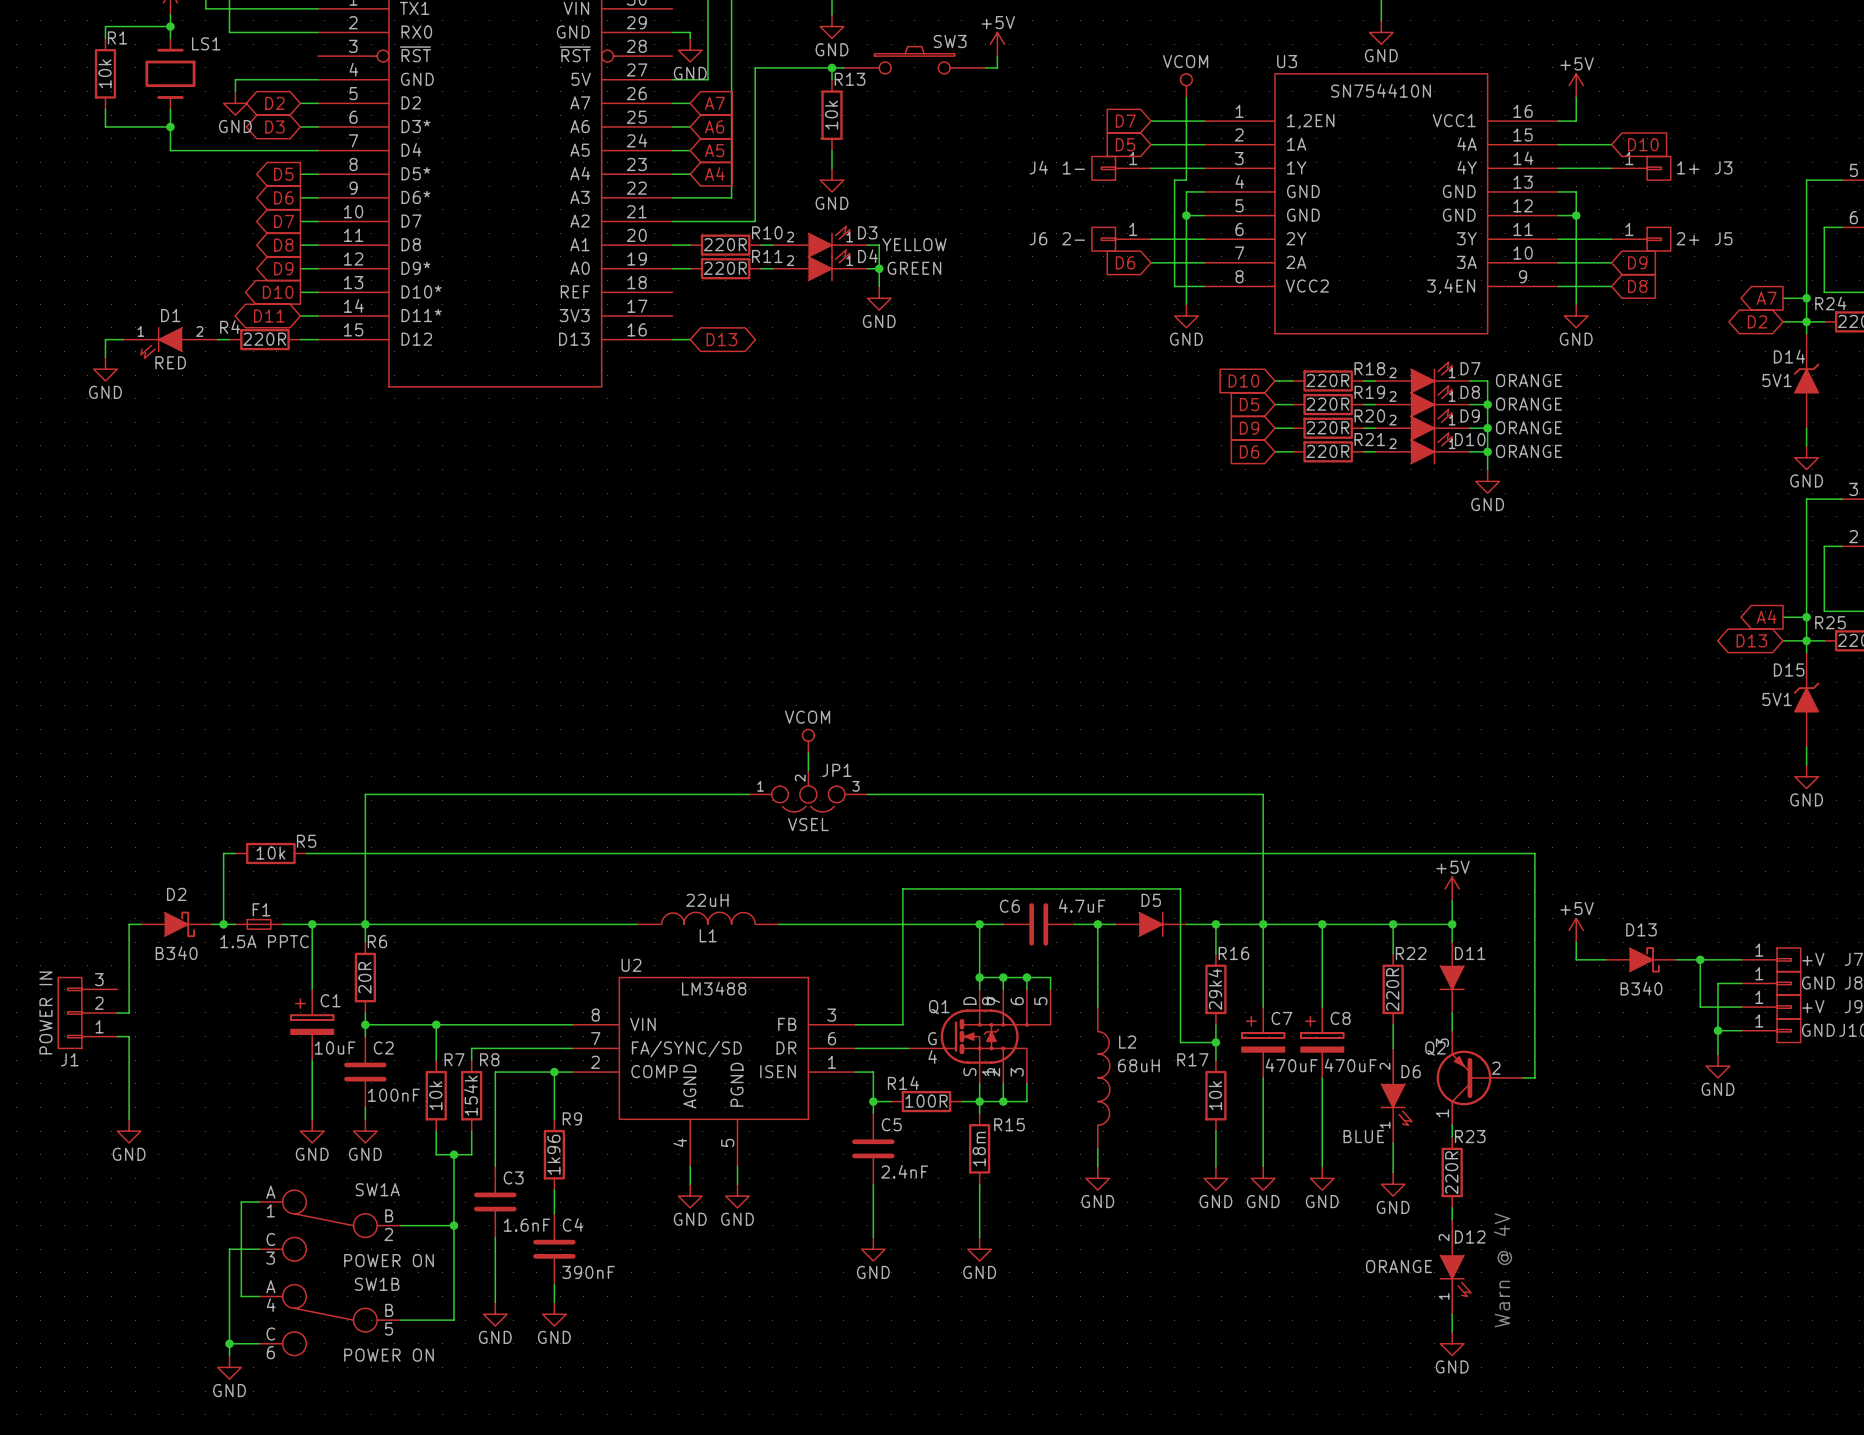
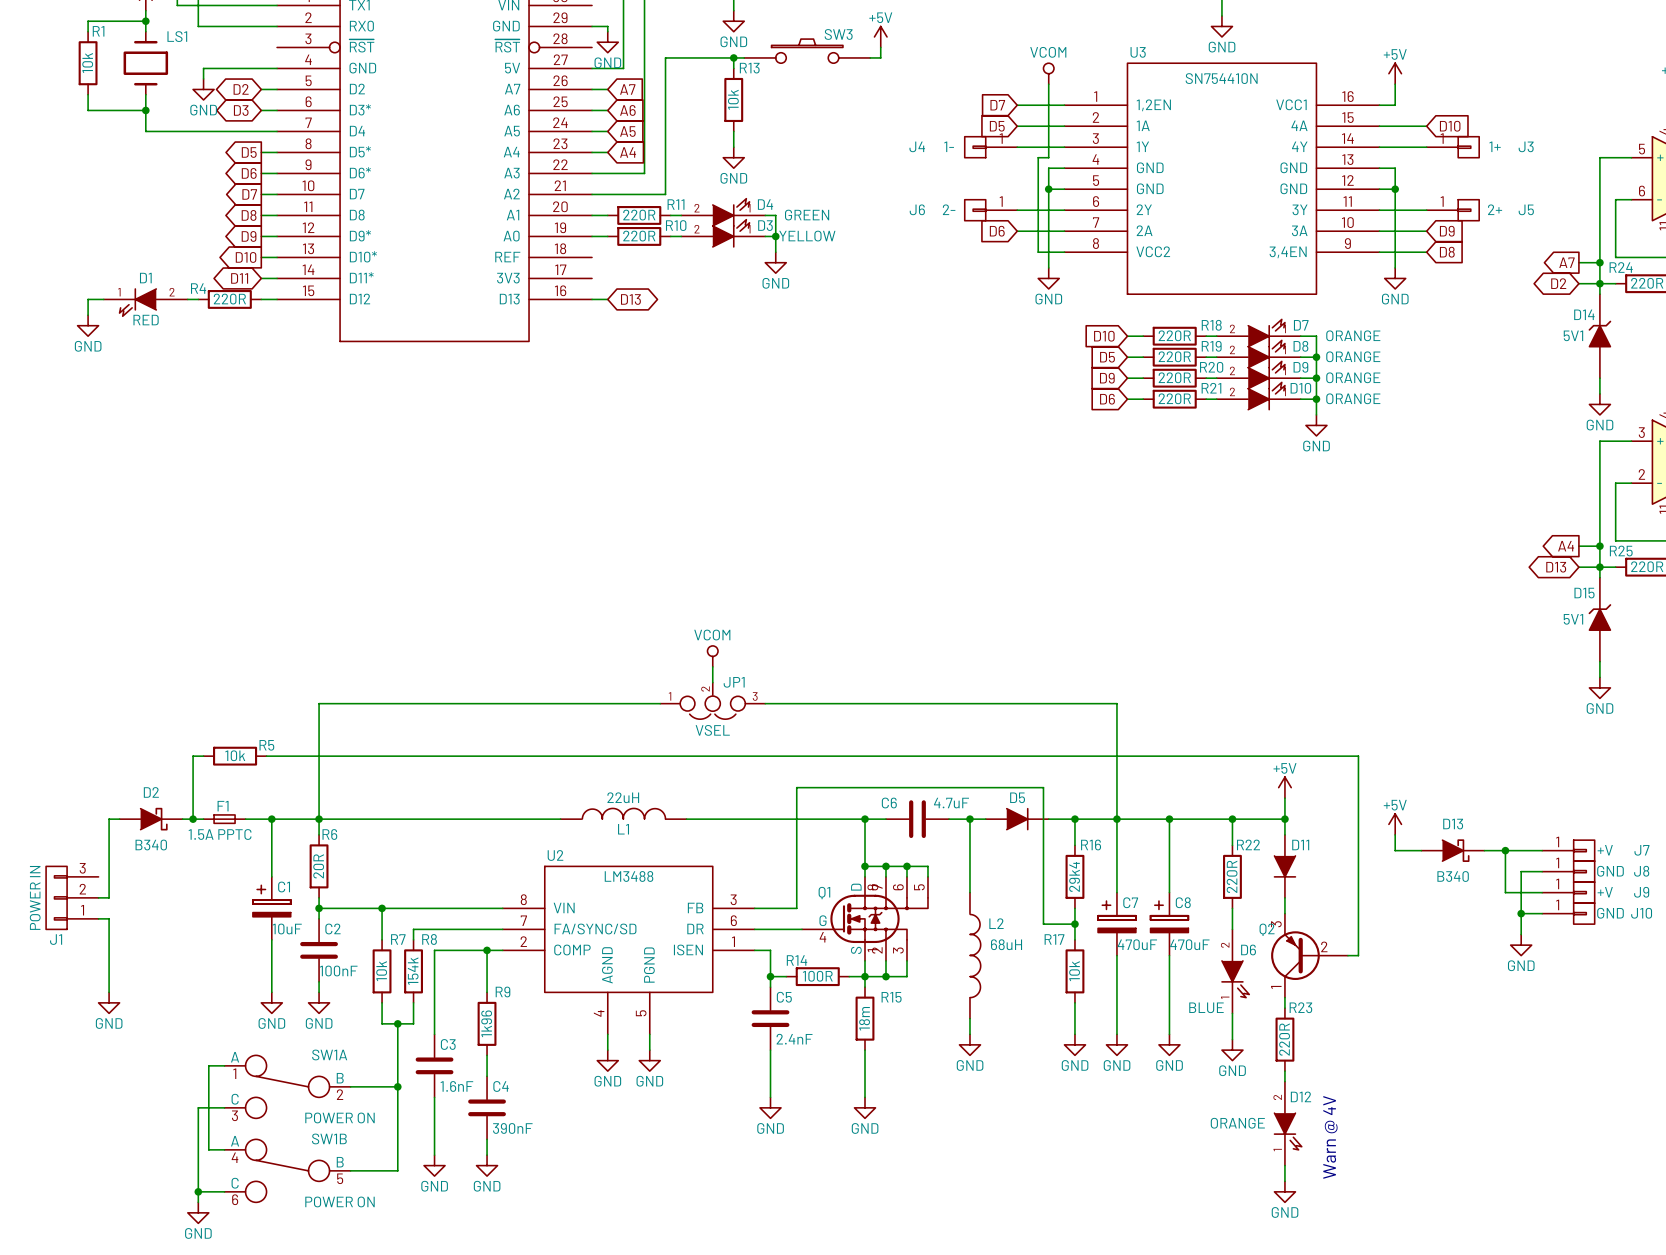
R10 name: R10 (767, 232) -> R11 (676, 204)
D3 name: D3 (867, 232) -> D4 (765, 204)
D3 value: YELLOW (914, 244) -> GREEN (807, 215)
R11 name: R11 (767, 256) -> R10 (676, 225)
D4 name: D4 (868, 256) -> D3 (765, 225)
D4 value: GREEN (914, 268) -> YELLOW (807, 236)

